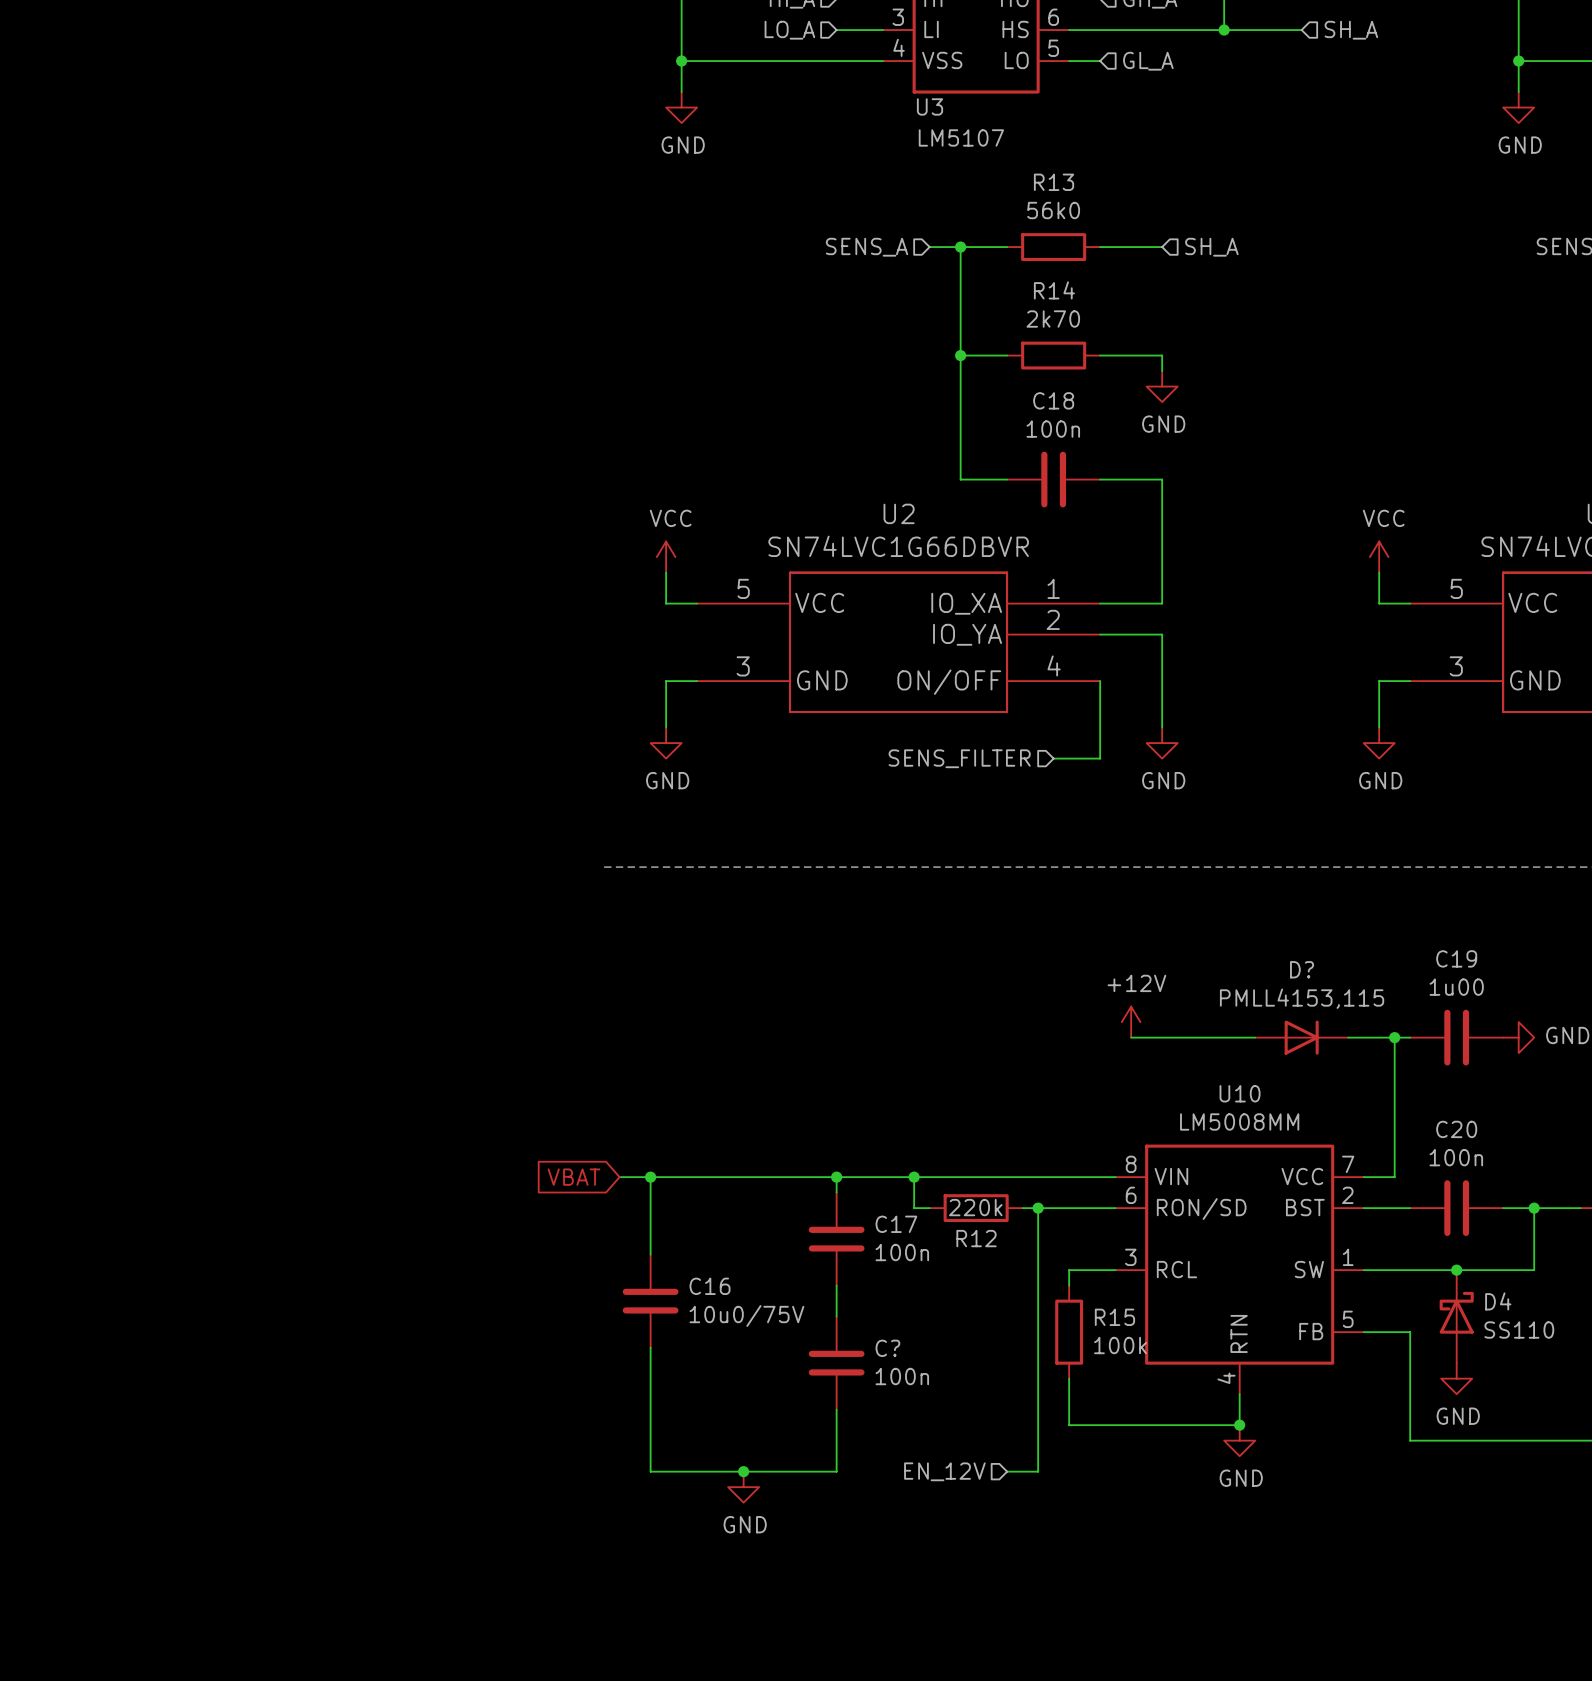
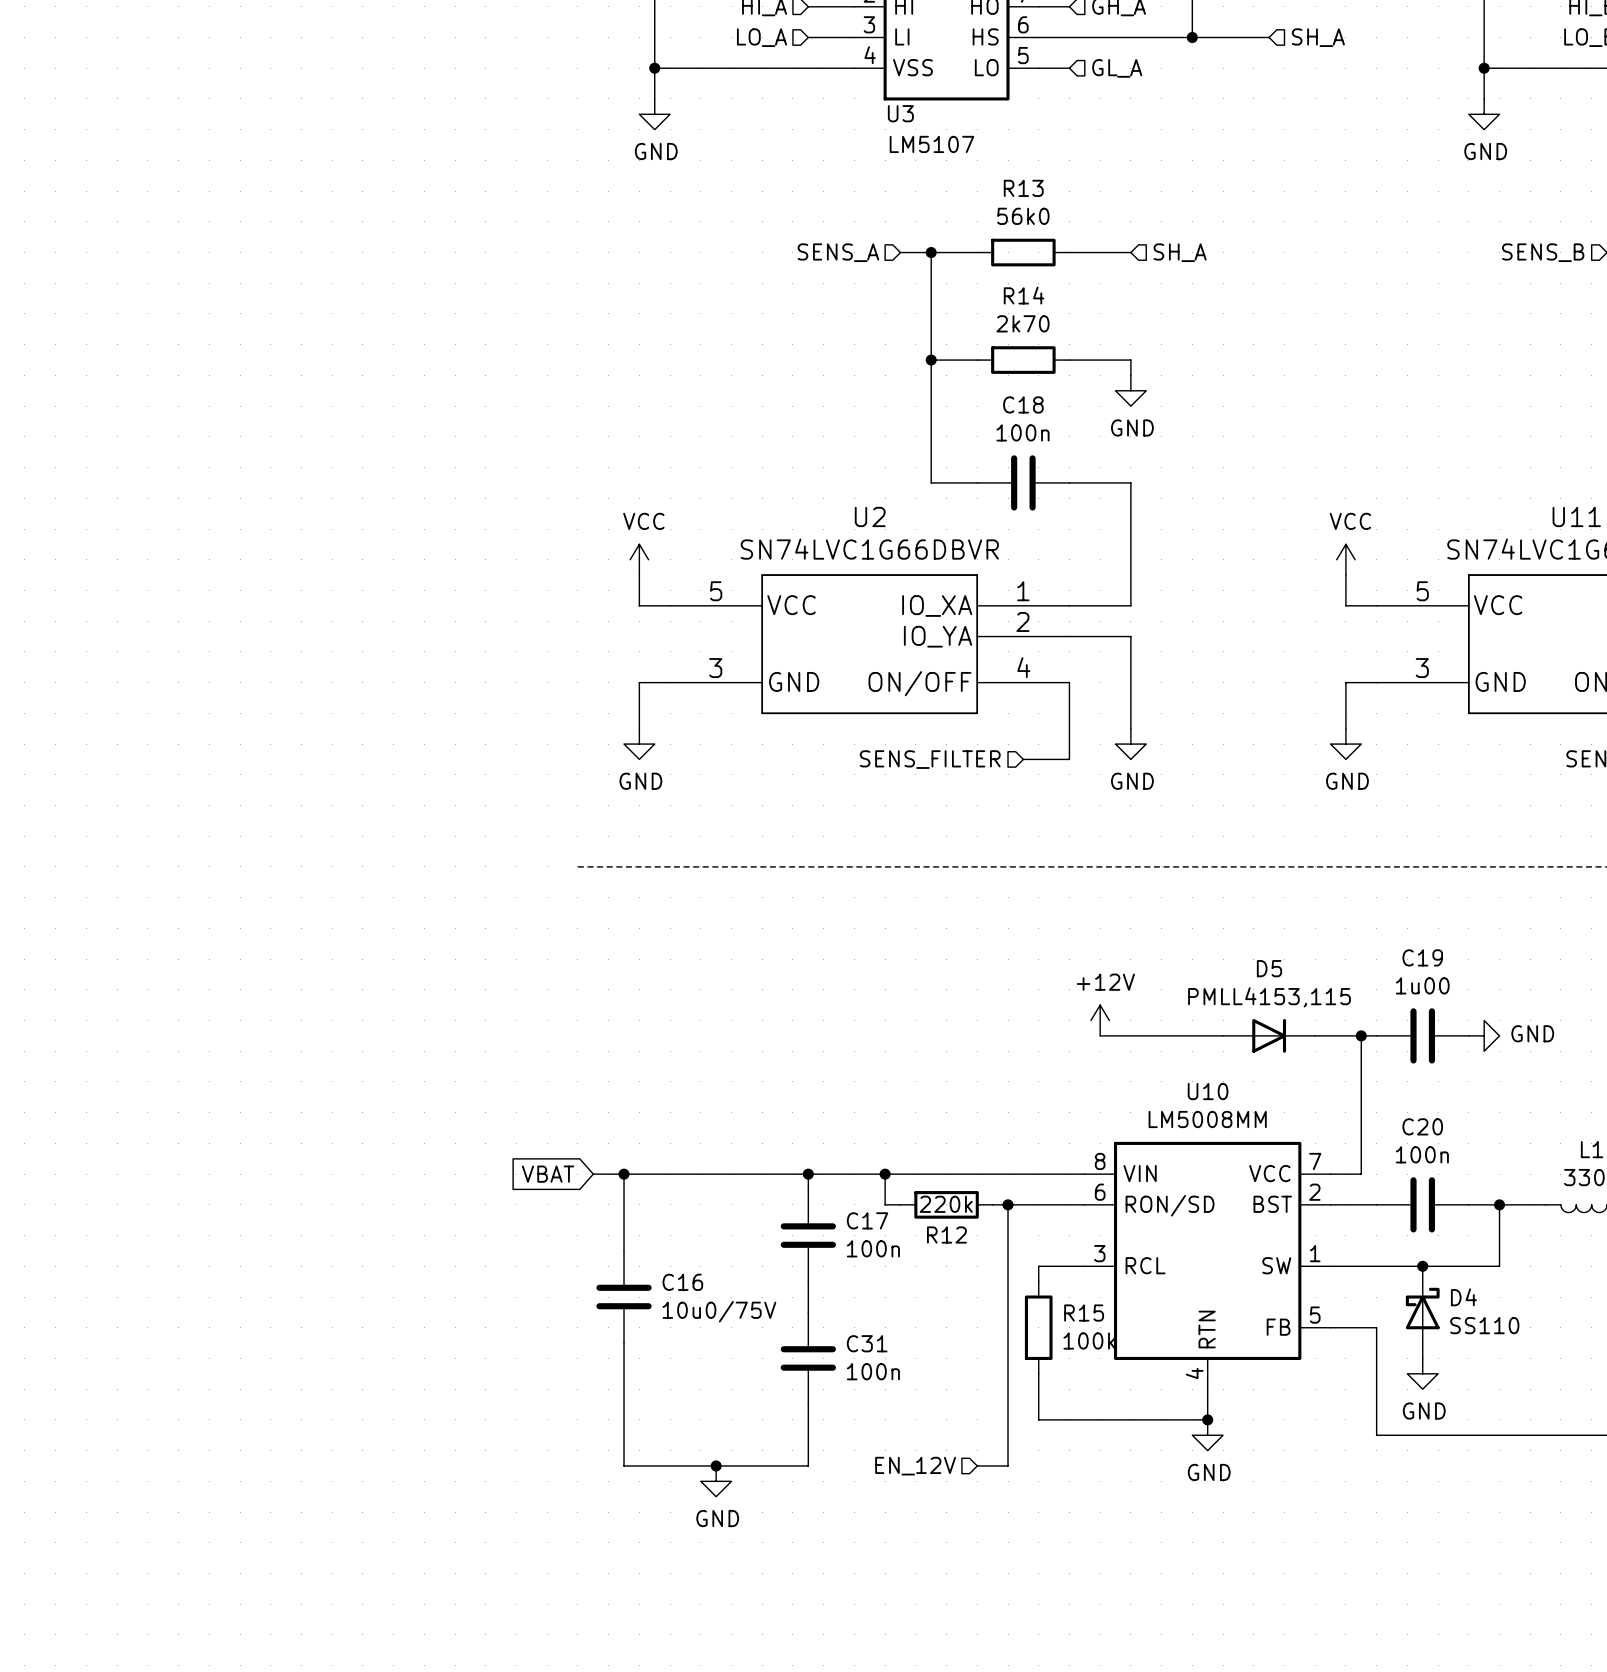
D? name: D? (1302, 969) -> D5 (1269, 968)
C? name: C? (887, 1348) -> C31 (867, 1343)

